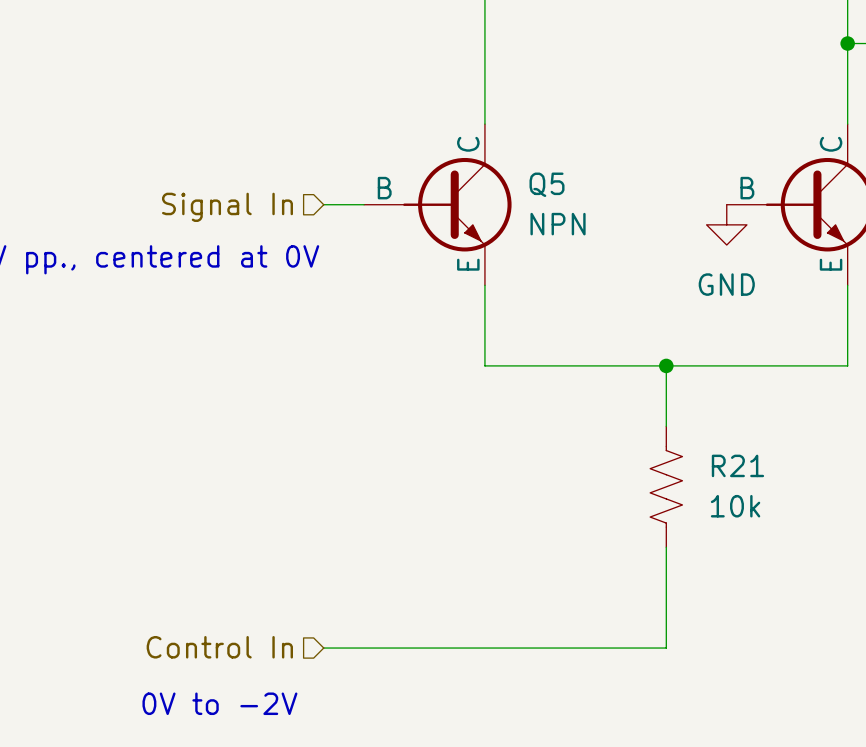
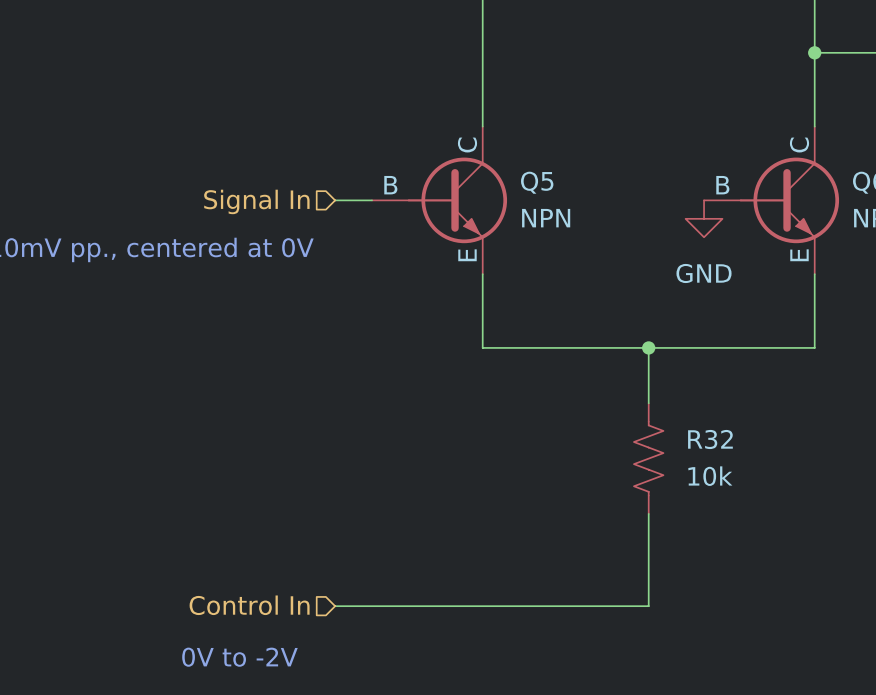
R21 name: R21 (737, 465) -> R32 (710, 439)

